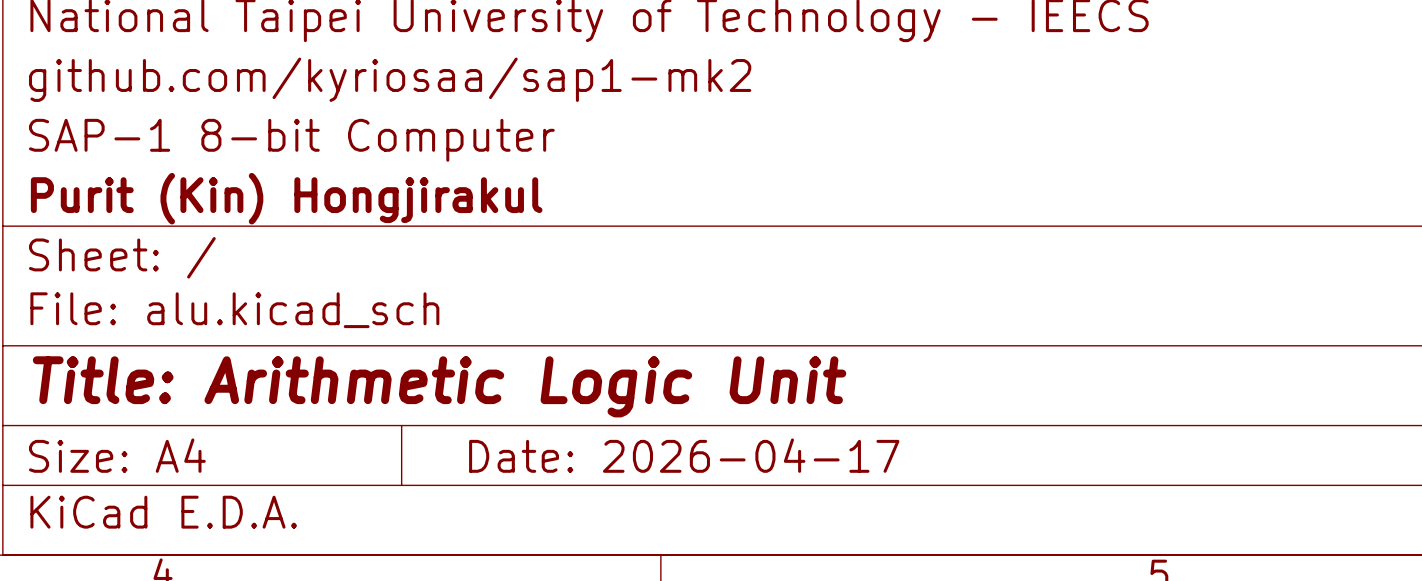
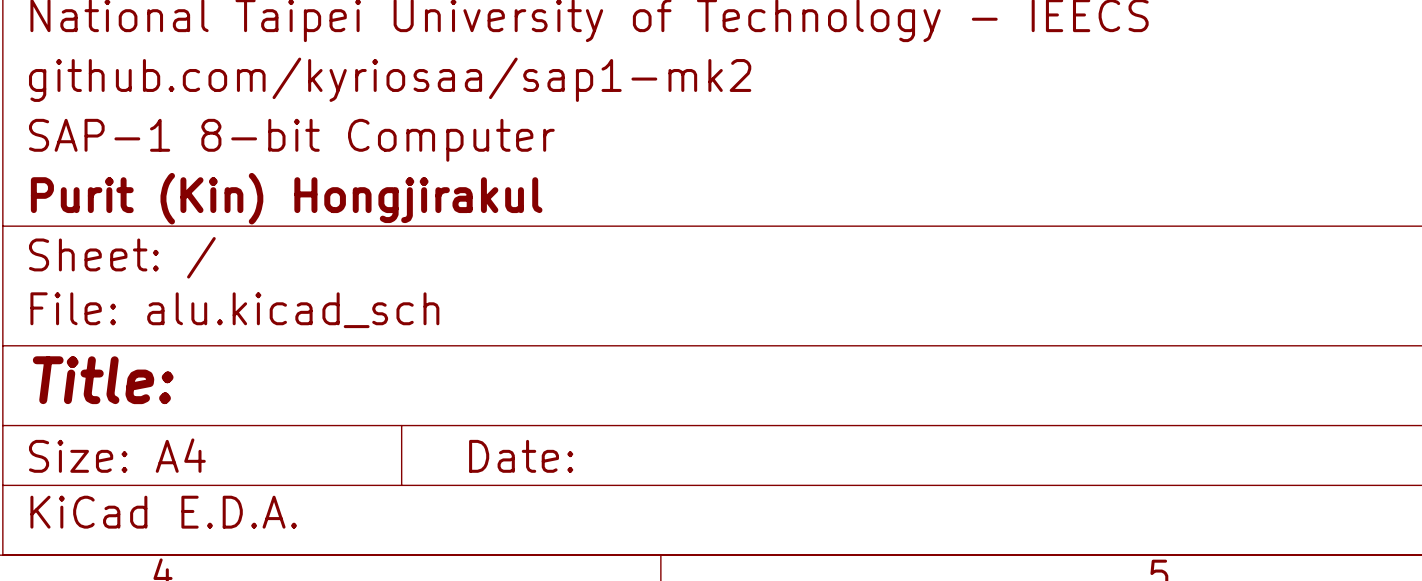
title block: Title: Arithmetic Logic Unit (439, 386) -> Title: (103, 380)
title block: Date: 2026-04-17 (684, 455) -> Date: (521, 456)

